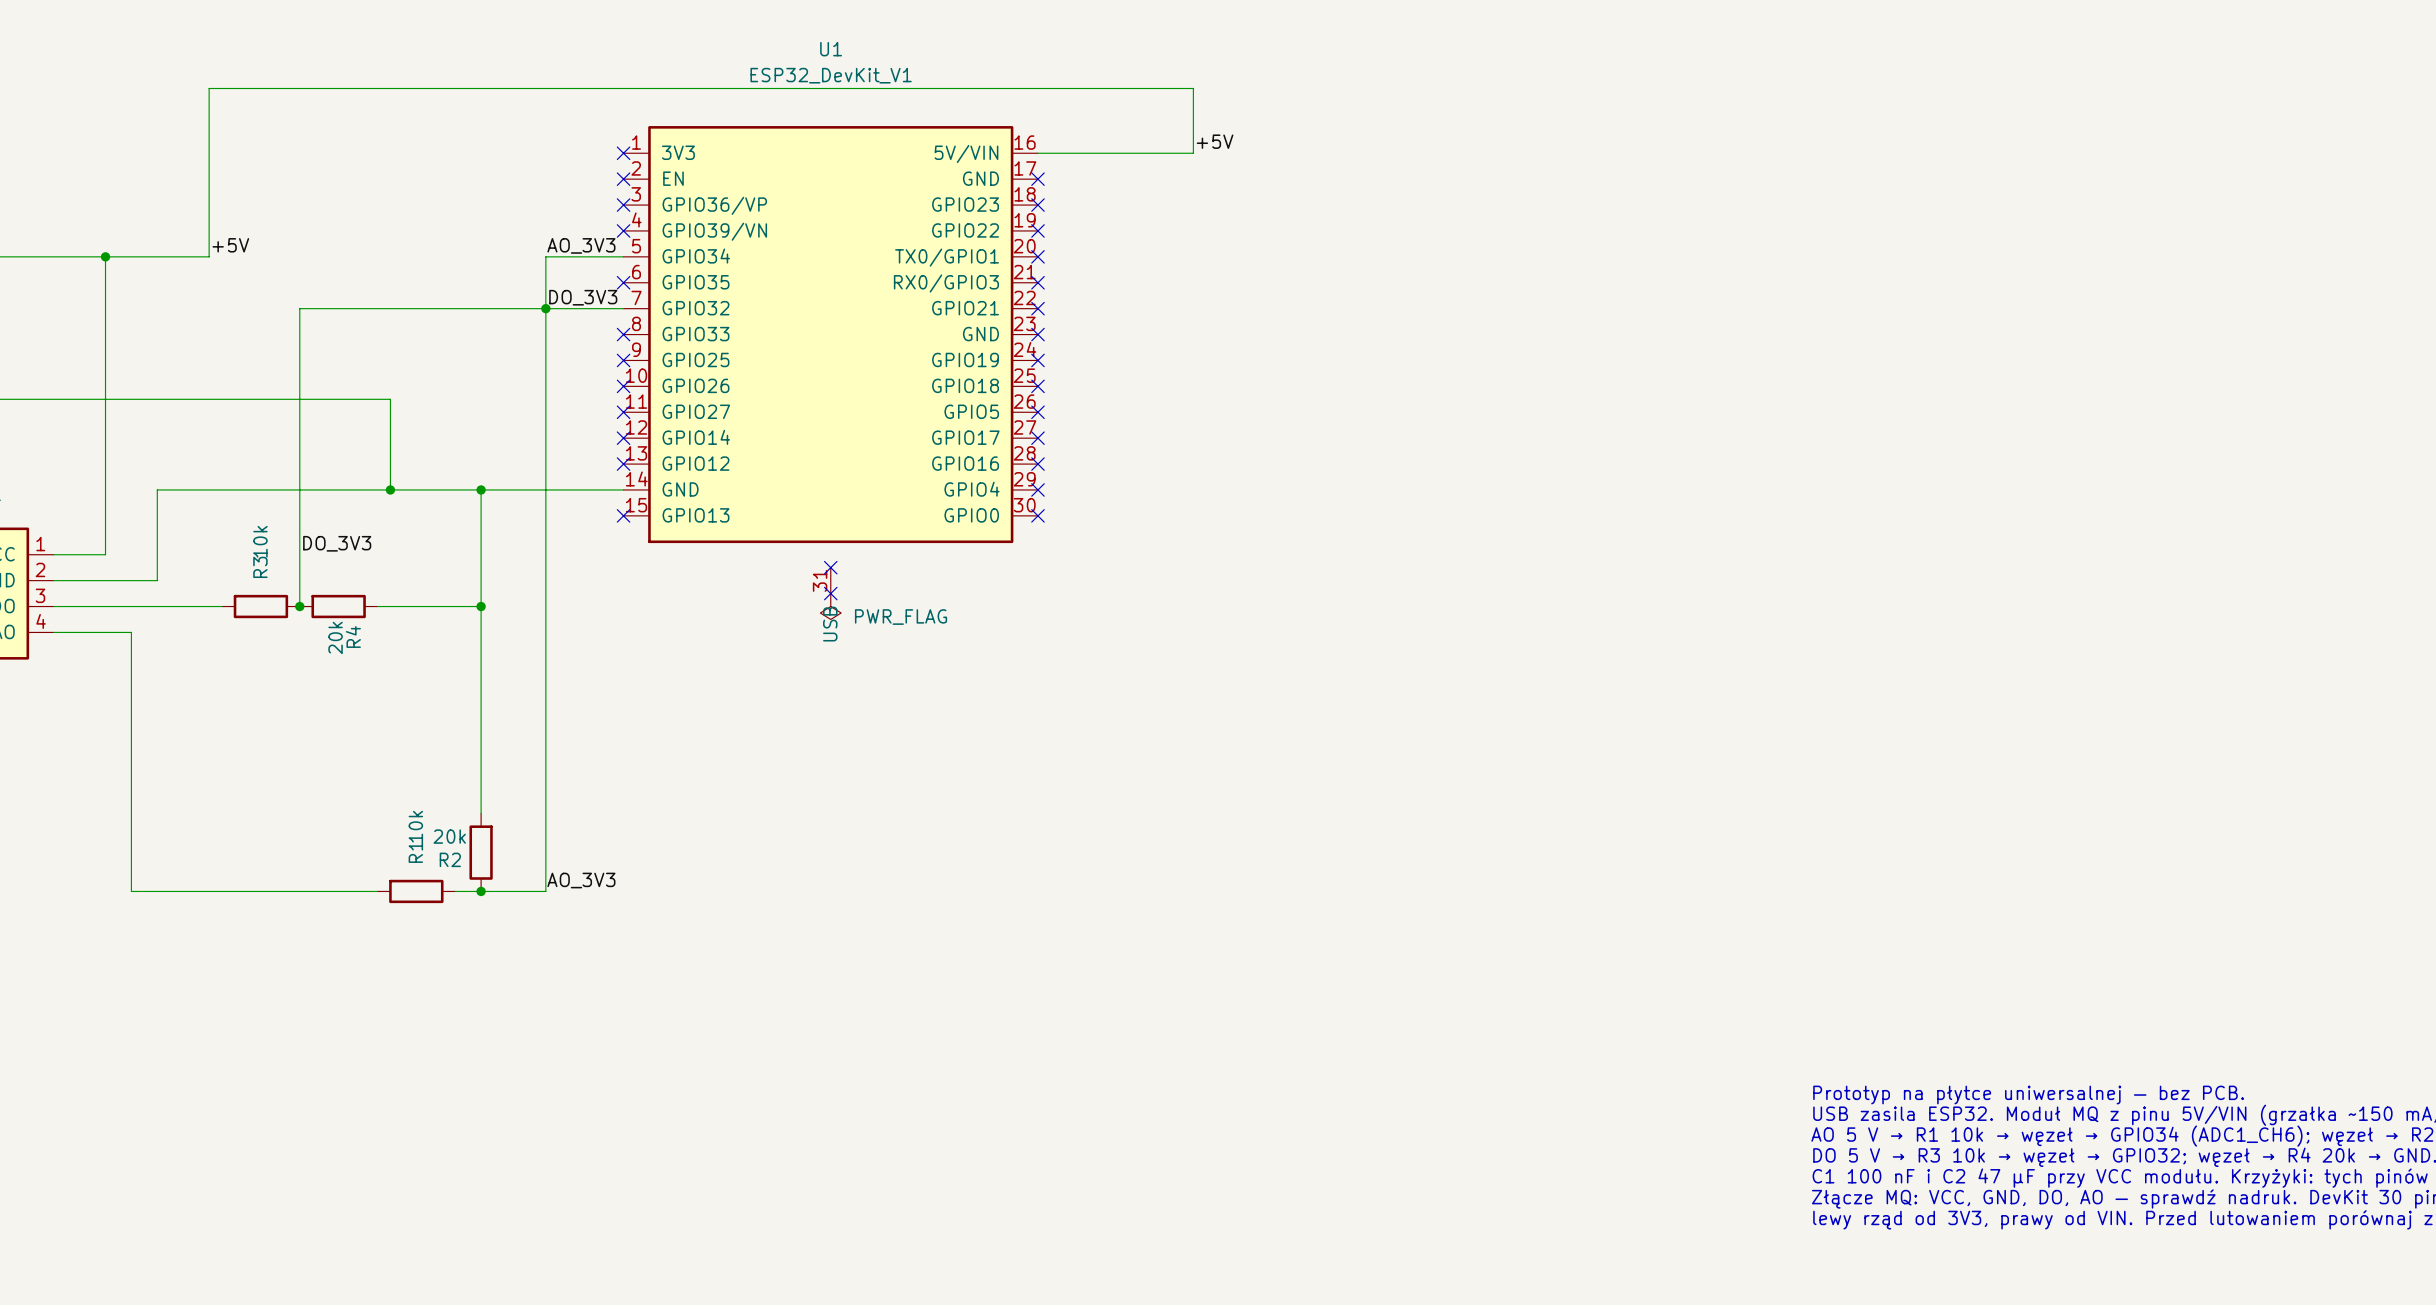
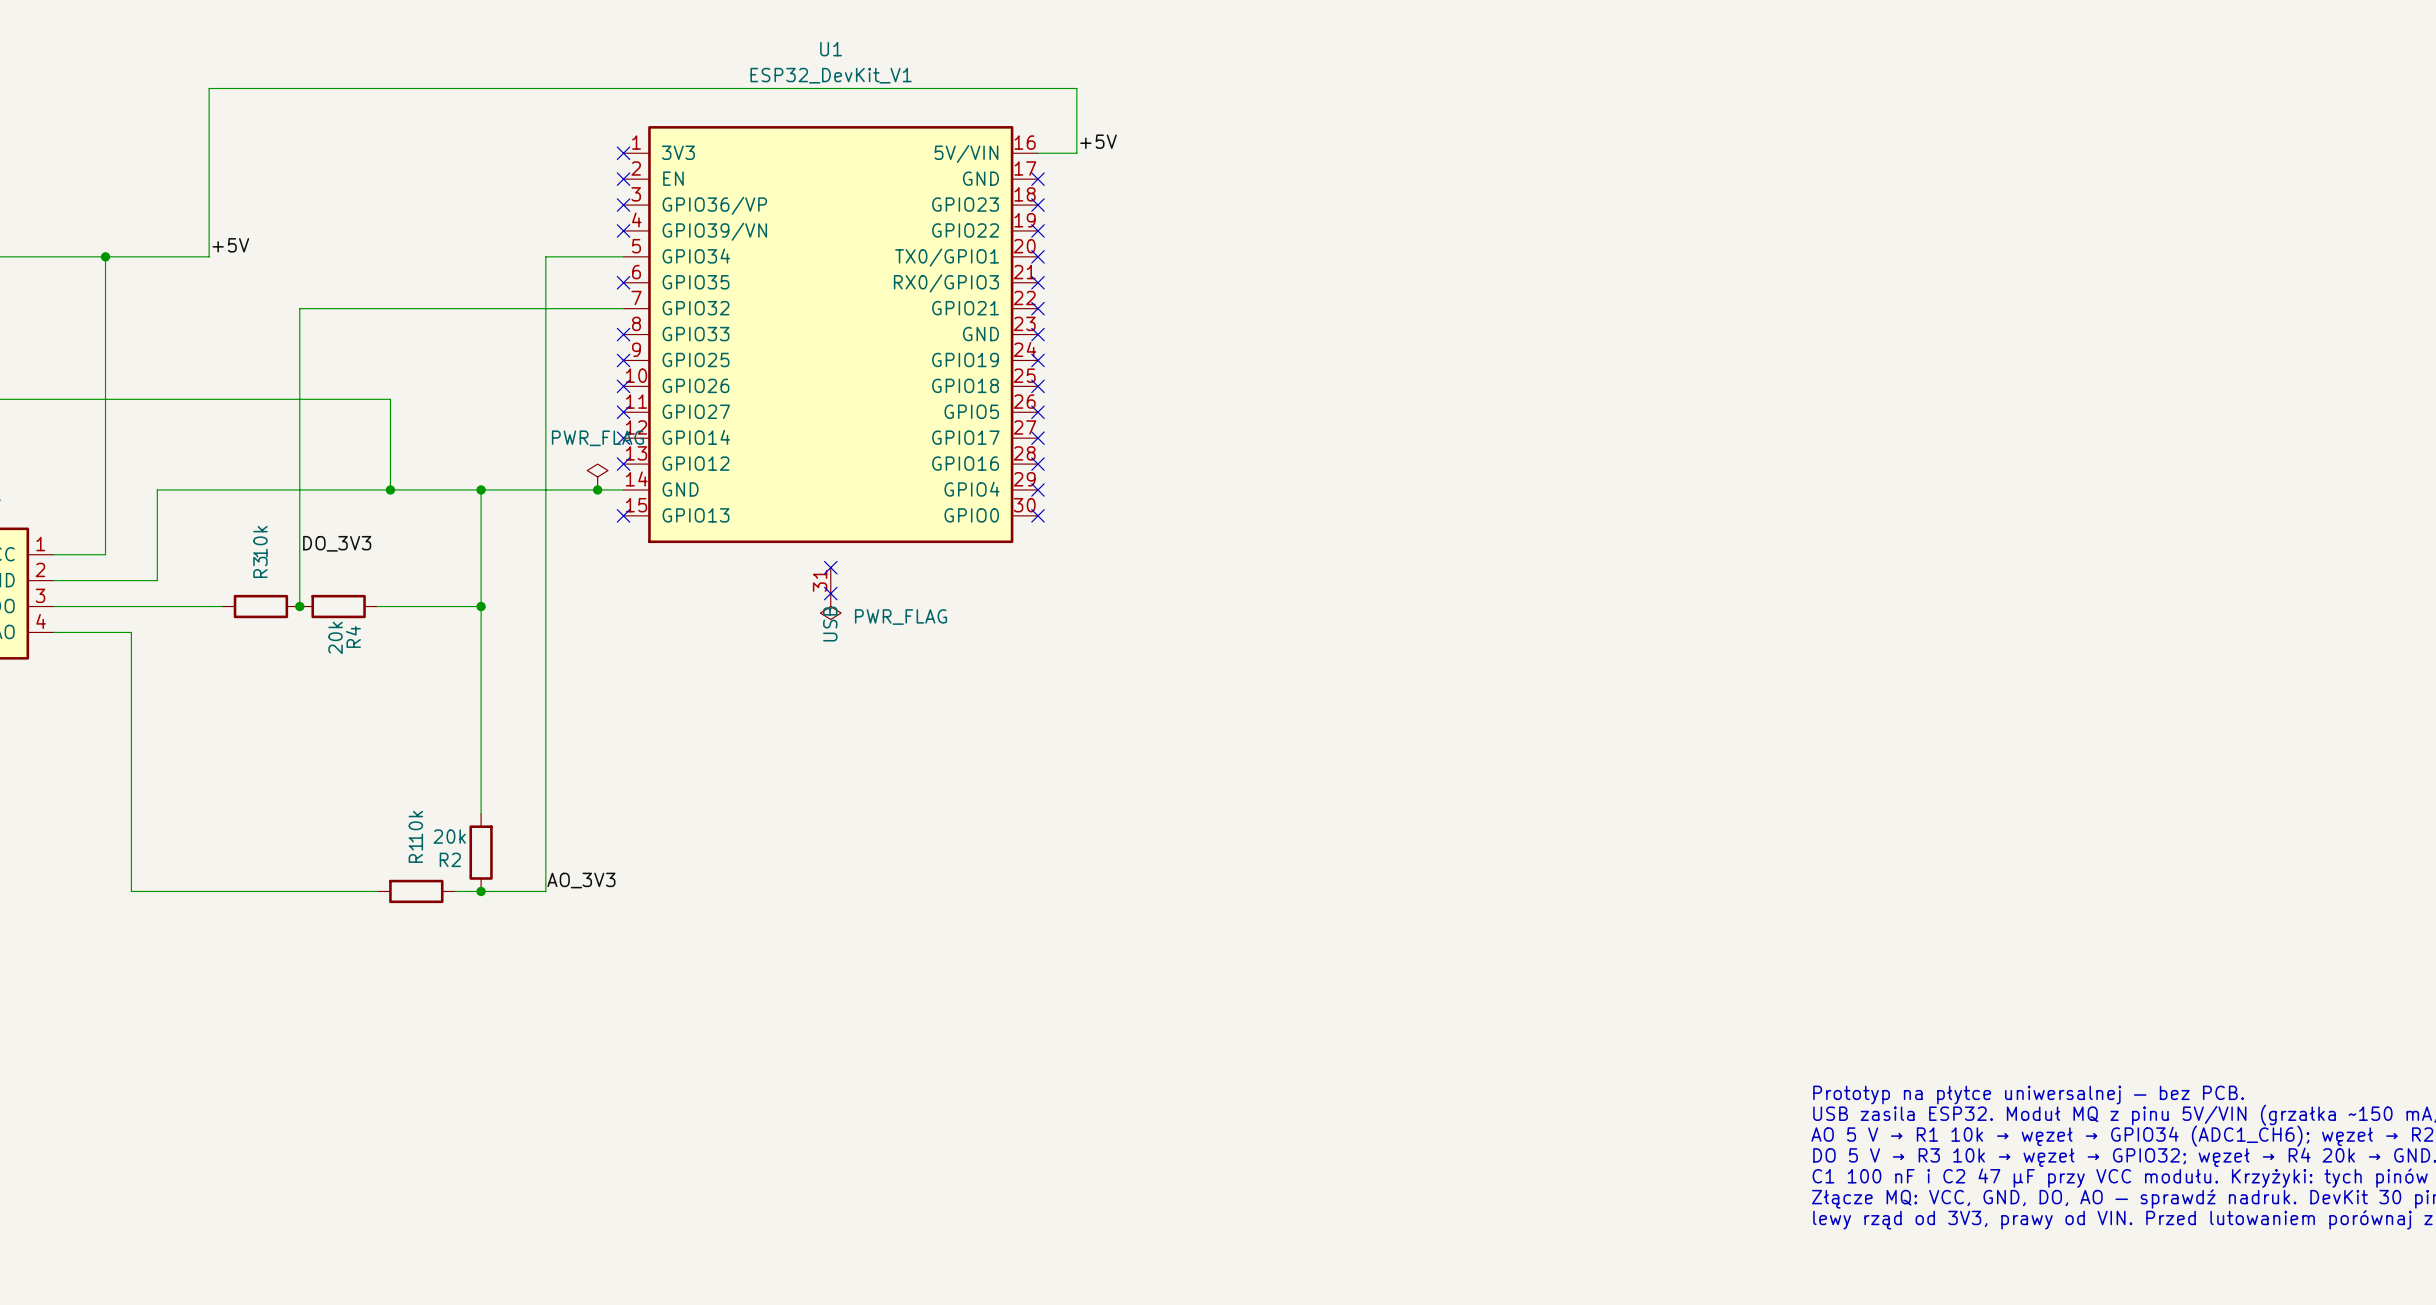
wire: (1076, 88) (1193, 88) (1193, 153) (1076, 153) -> (1076, 88) (1076, 153)
label position: +5V (1215, 141) -> +5V (1098, 141)
label: AO_3V3 (581, 245) -> none
label: DO_3V3 (583, 297) -> none
junction: (545, 308) -> none
power symbol: none -> PWR_FLAG (597, 477)
junction: none -> (597, 489)

